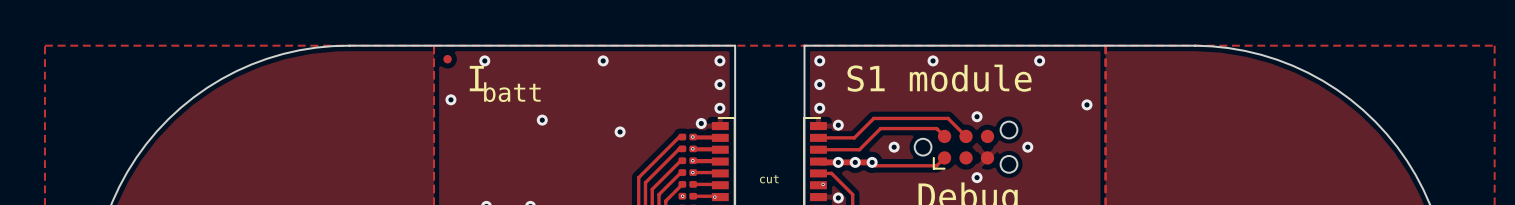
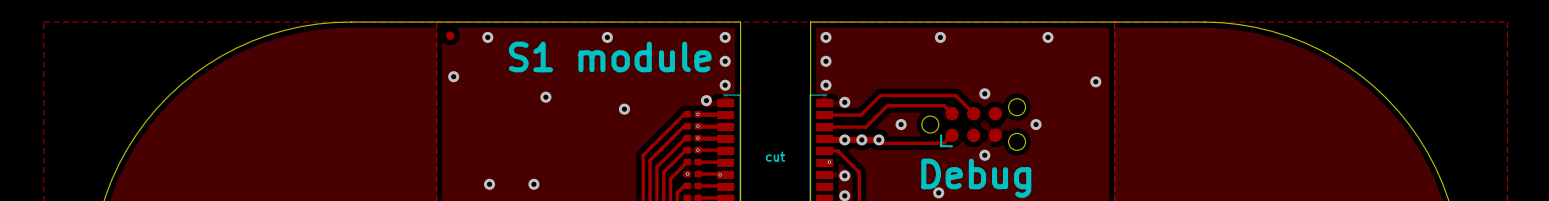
text: I (476, 78) -> none
text position: S1 module (939, 78) -> S1 module (610, 56)
text: batt (512, 92) -> none

